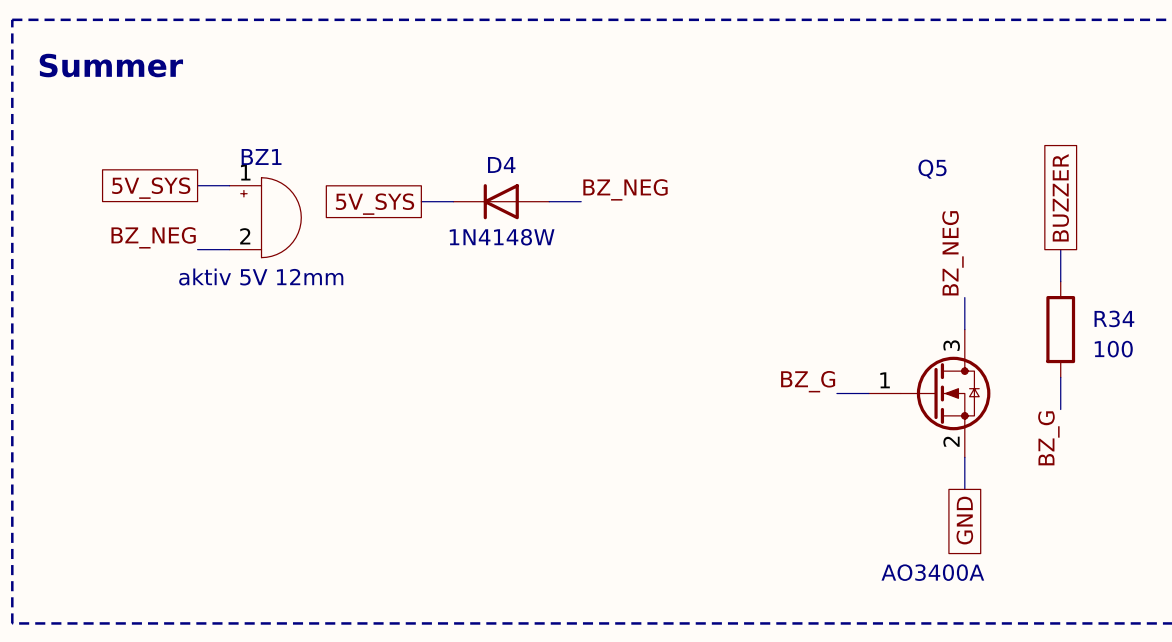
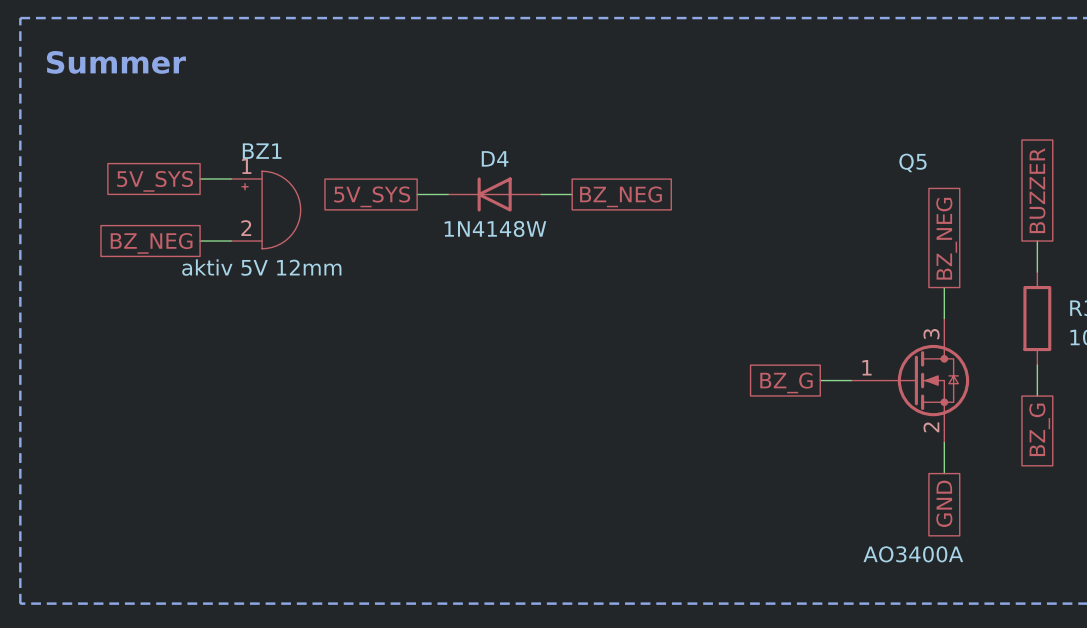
label: BZ_NEG (625, 189) -> none
global label: none -> BZ_NEG (620, 196)
label: BZ_NEG (153, 237) -> none
global label: none -> BZ_NEG (946, 238)
global label: none -> BZ_NEG (151, 243)
label: BZ_NEG (952, 253) -> none
label: BZ_G (808, 381) -> none
global label: none -> BZ_G (786, 382)
label: BZ_G (1048, 438) -> none
global label: none -> BZ_G (1039, 429)

